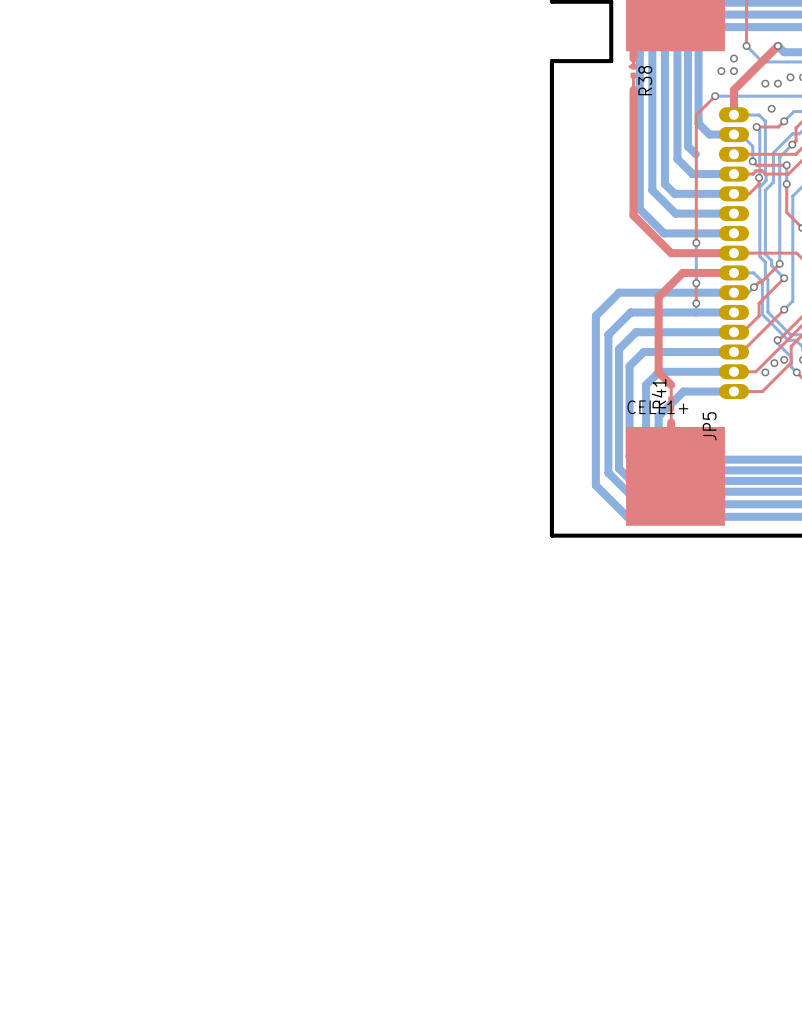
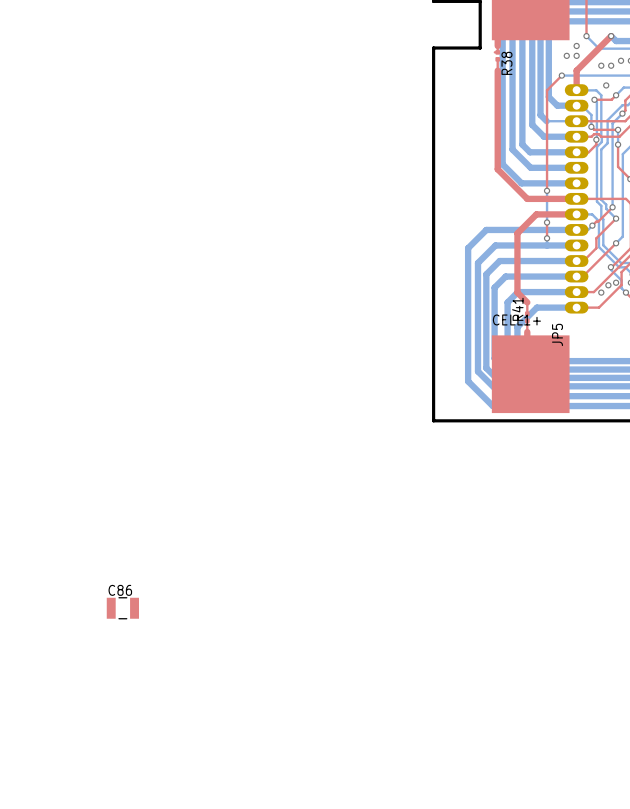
bottom track: none -> (546, 121) (576, 121)
C86: none -> (122, 608)

